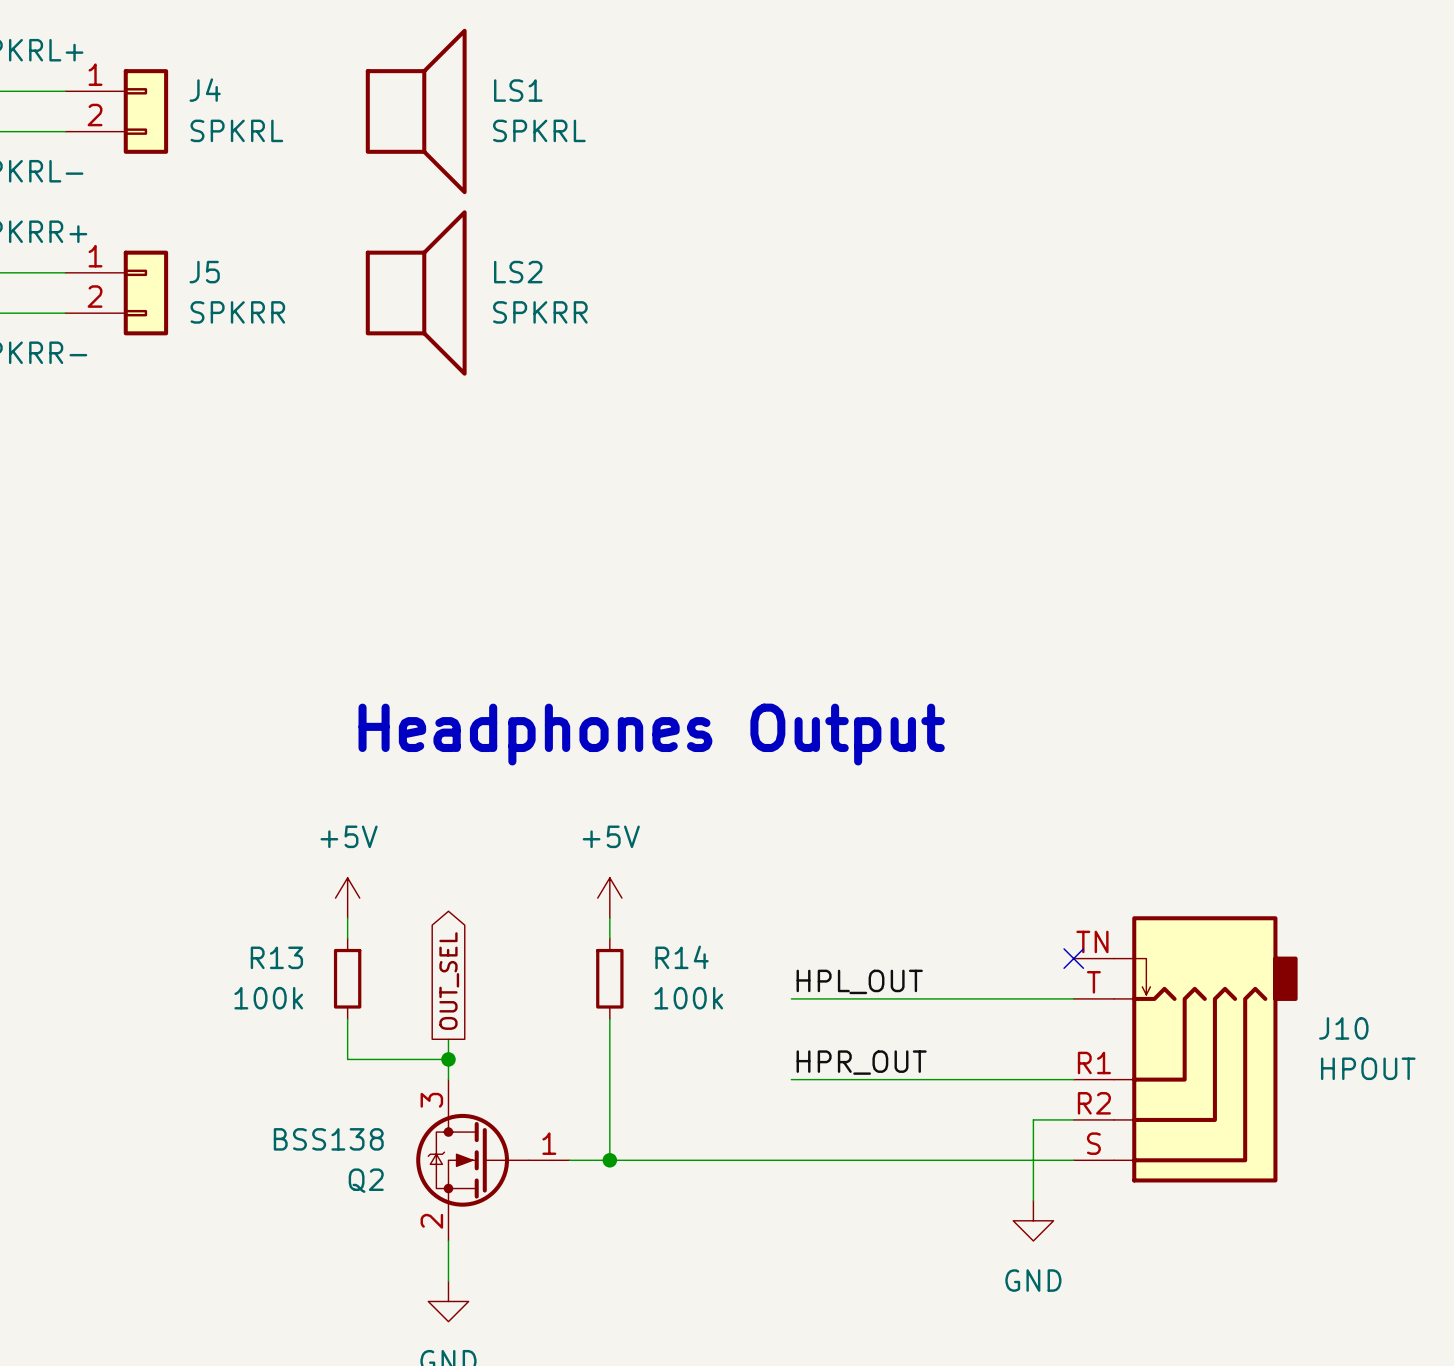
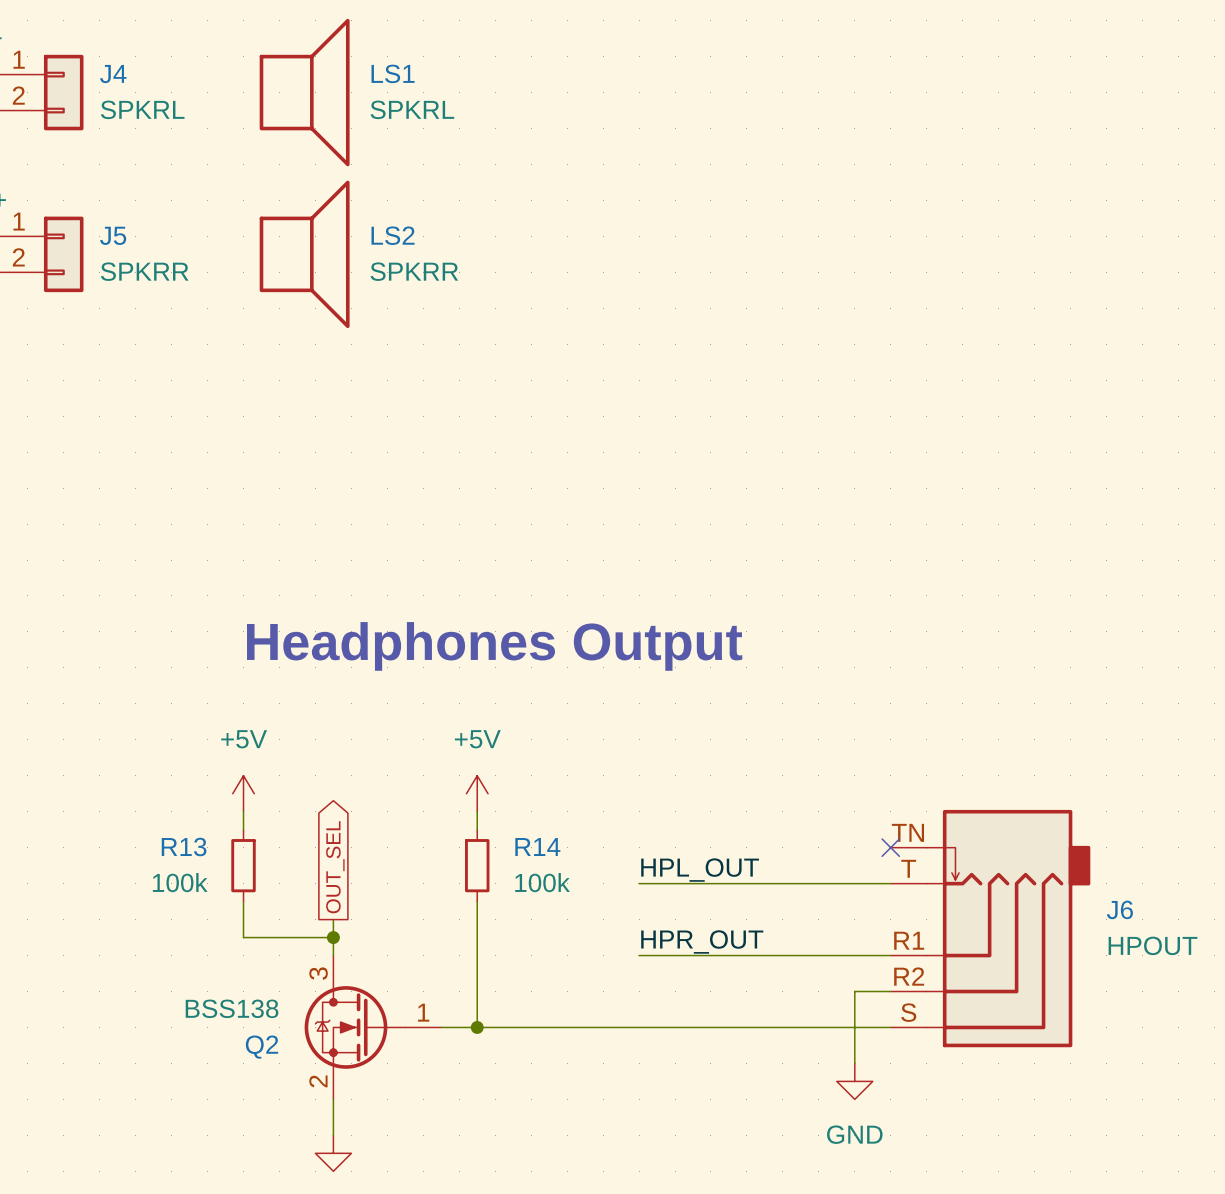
J10 name: J10 (1343, 1028) -> J6 (1119, 909)

